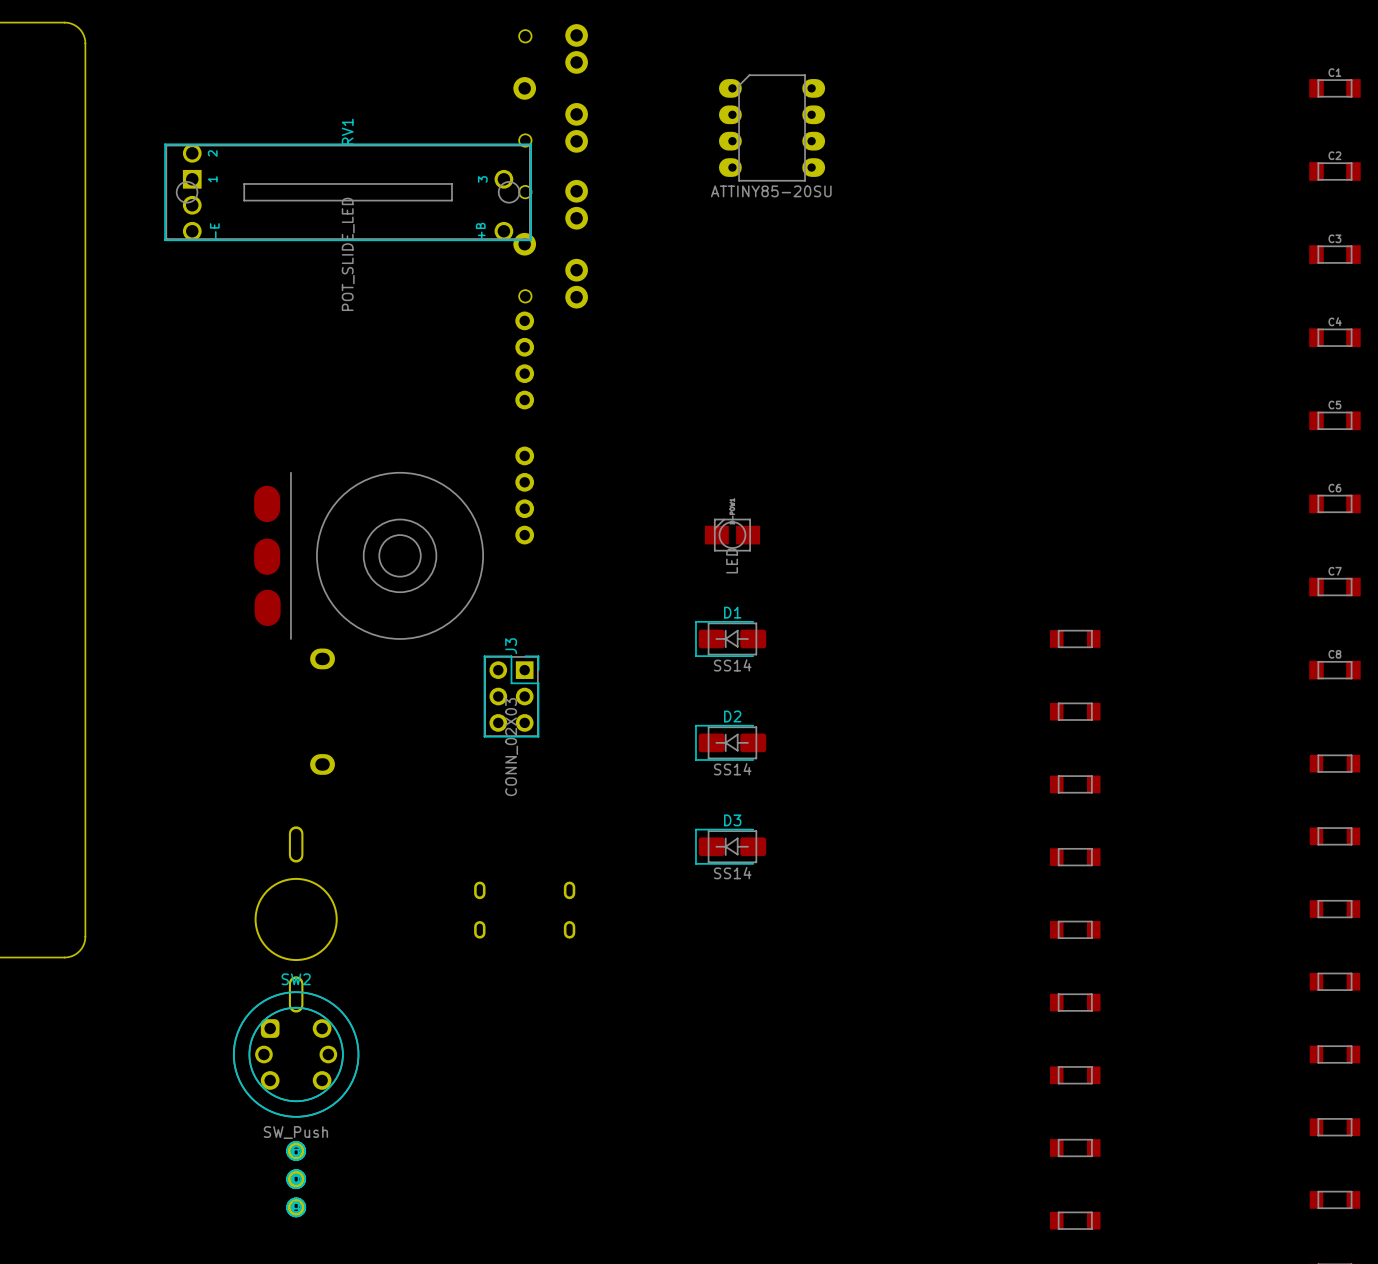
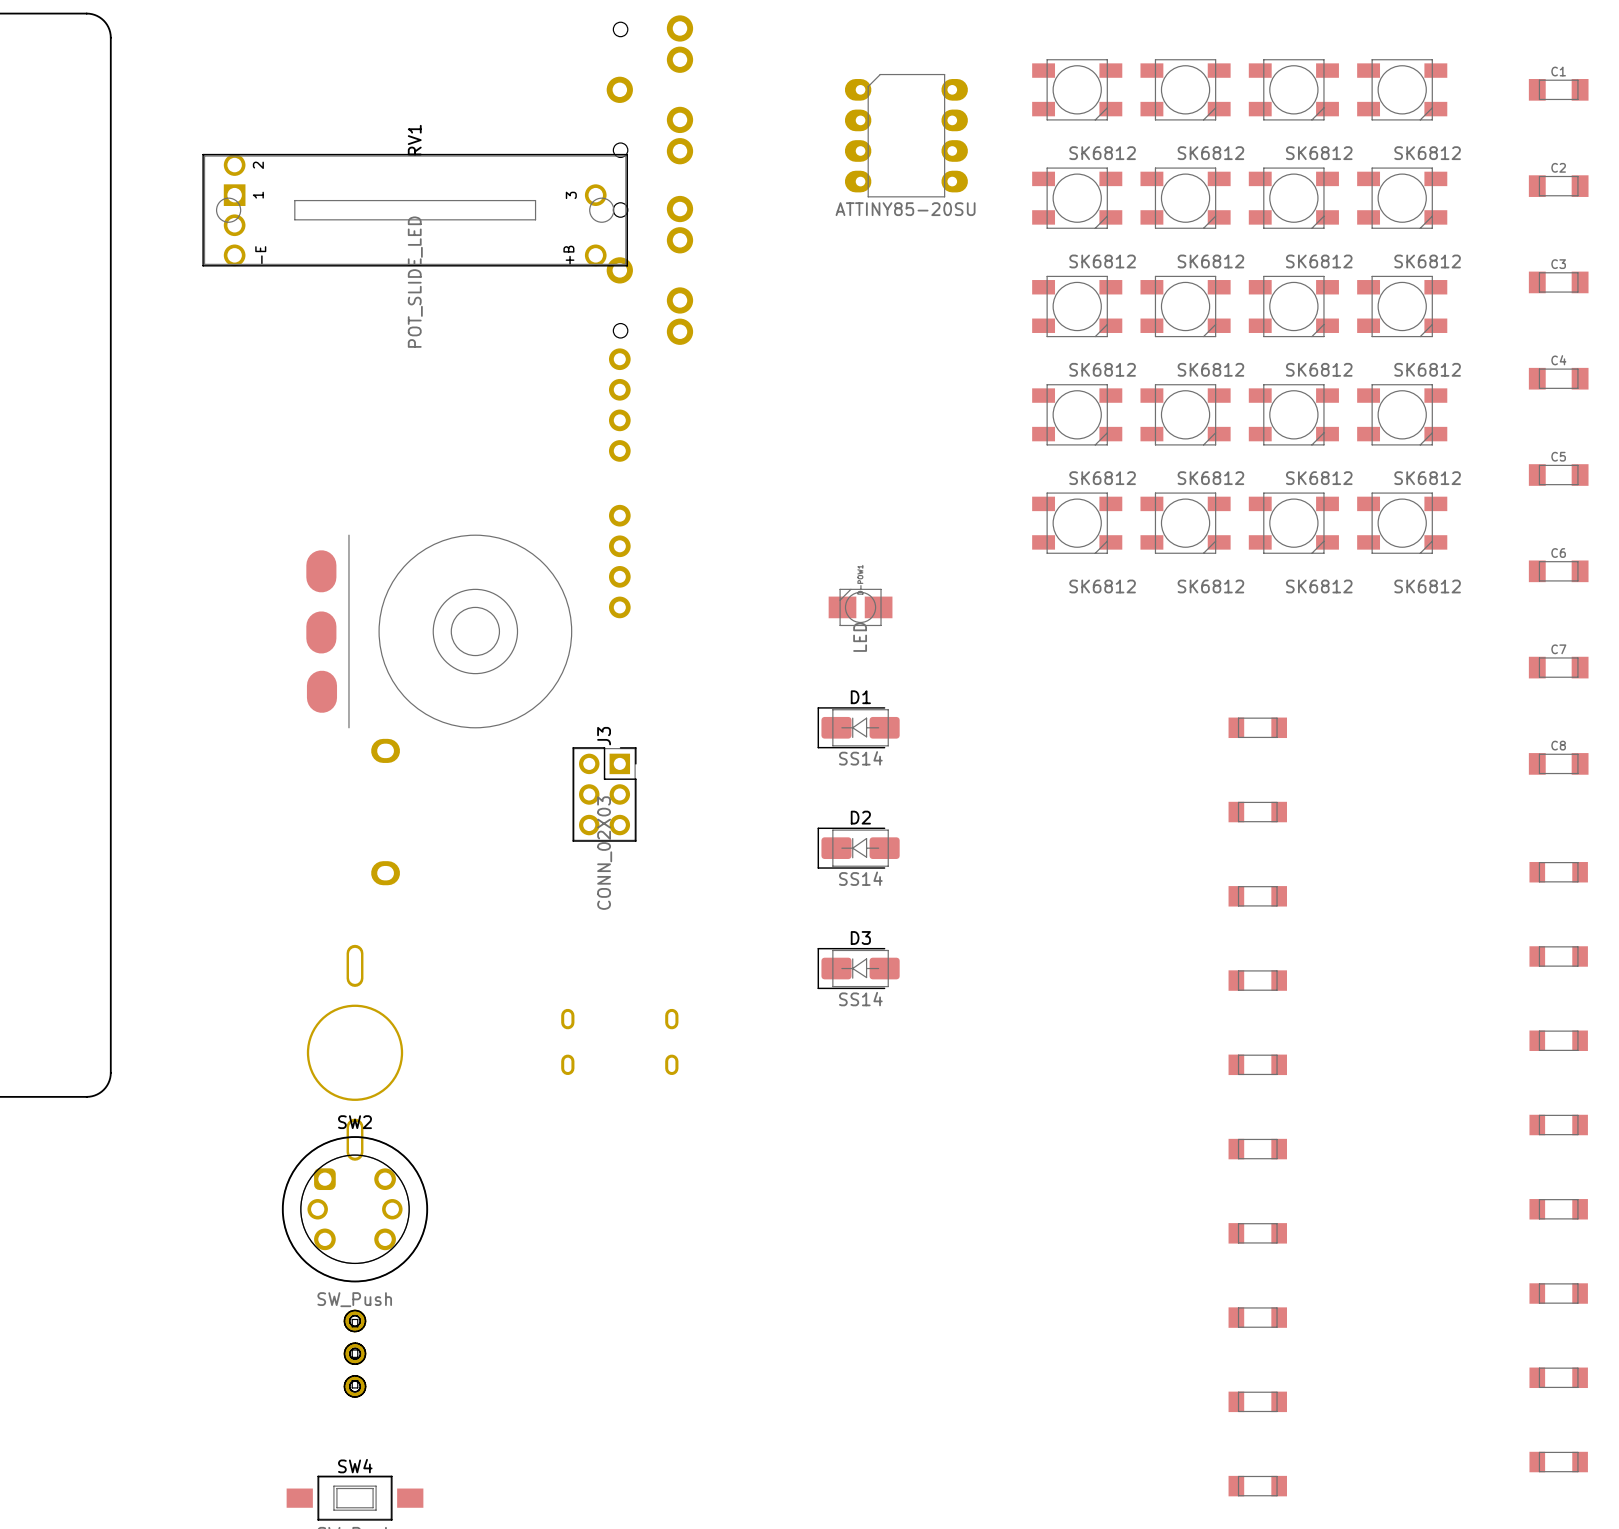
part: none -> SK6812 (1077, 89)
part: none -> SK6812 (1185, 89)
part: none -> SK6812 (1293, 89)
part: none -> SK6812 (1402, 89)
part: none -> SK6812 (1077, 198)
part: none -> SK6812 (1185, 198)
part: none -> SK6812 (1293, 198)
part: none -> SK6812 (1402, 198)
part: none -> SK6812 (1077, 306)
part: none -> SK6812 (1185, 306)
part: none -> SK6812 (1293, 306)
part: none -> SK6812 (1402, 306)
part: none -> SK6812 (1077, 414)
part: none -> SK6812 (1185, 414)
part: none -> SK6812 (1293, 414)
part: none -> SK6812 (1402, 414)
part: none -> SK6812 (1077, 523)
part: none -> SK6812 (1185, 523)
part: none -> SK6812 (1293, 523)
part: none -> SK6812 (1402, 523)

